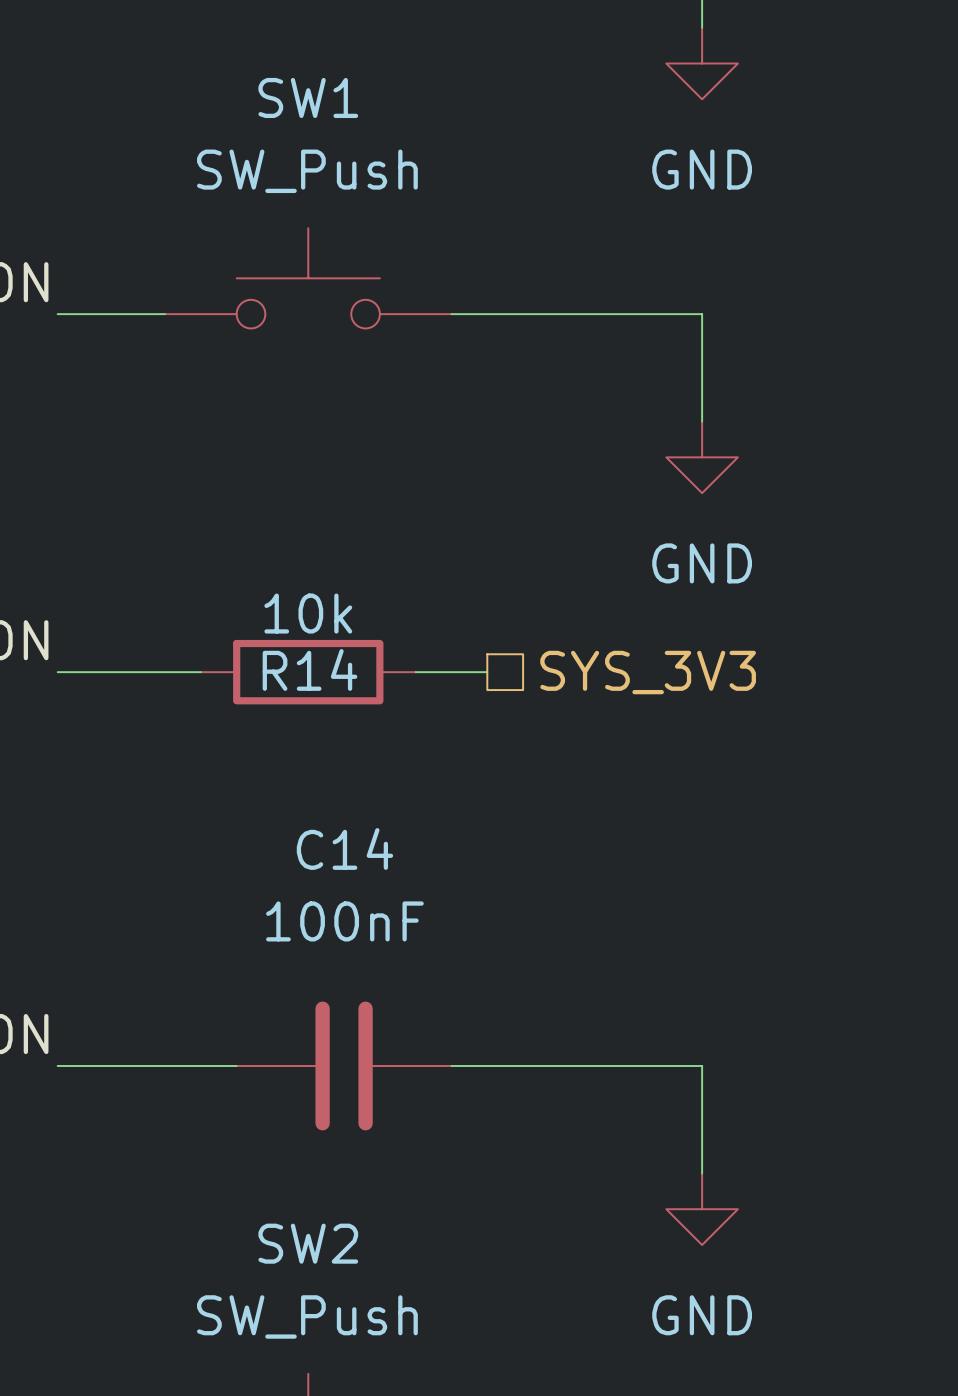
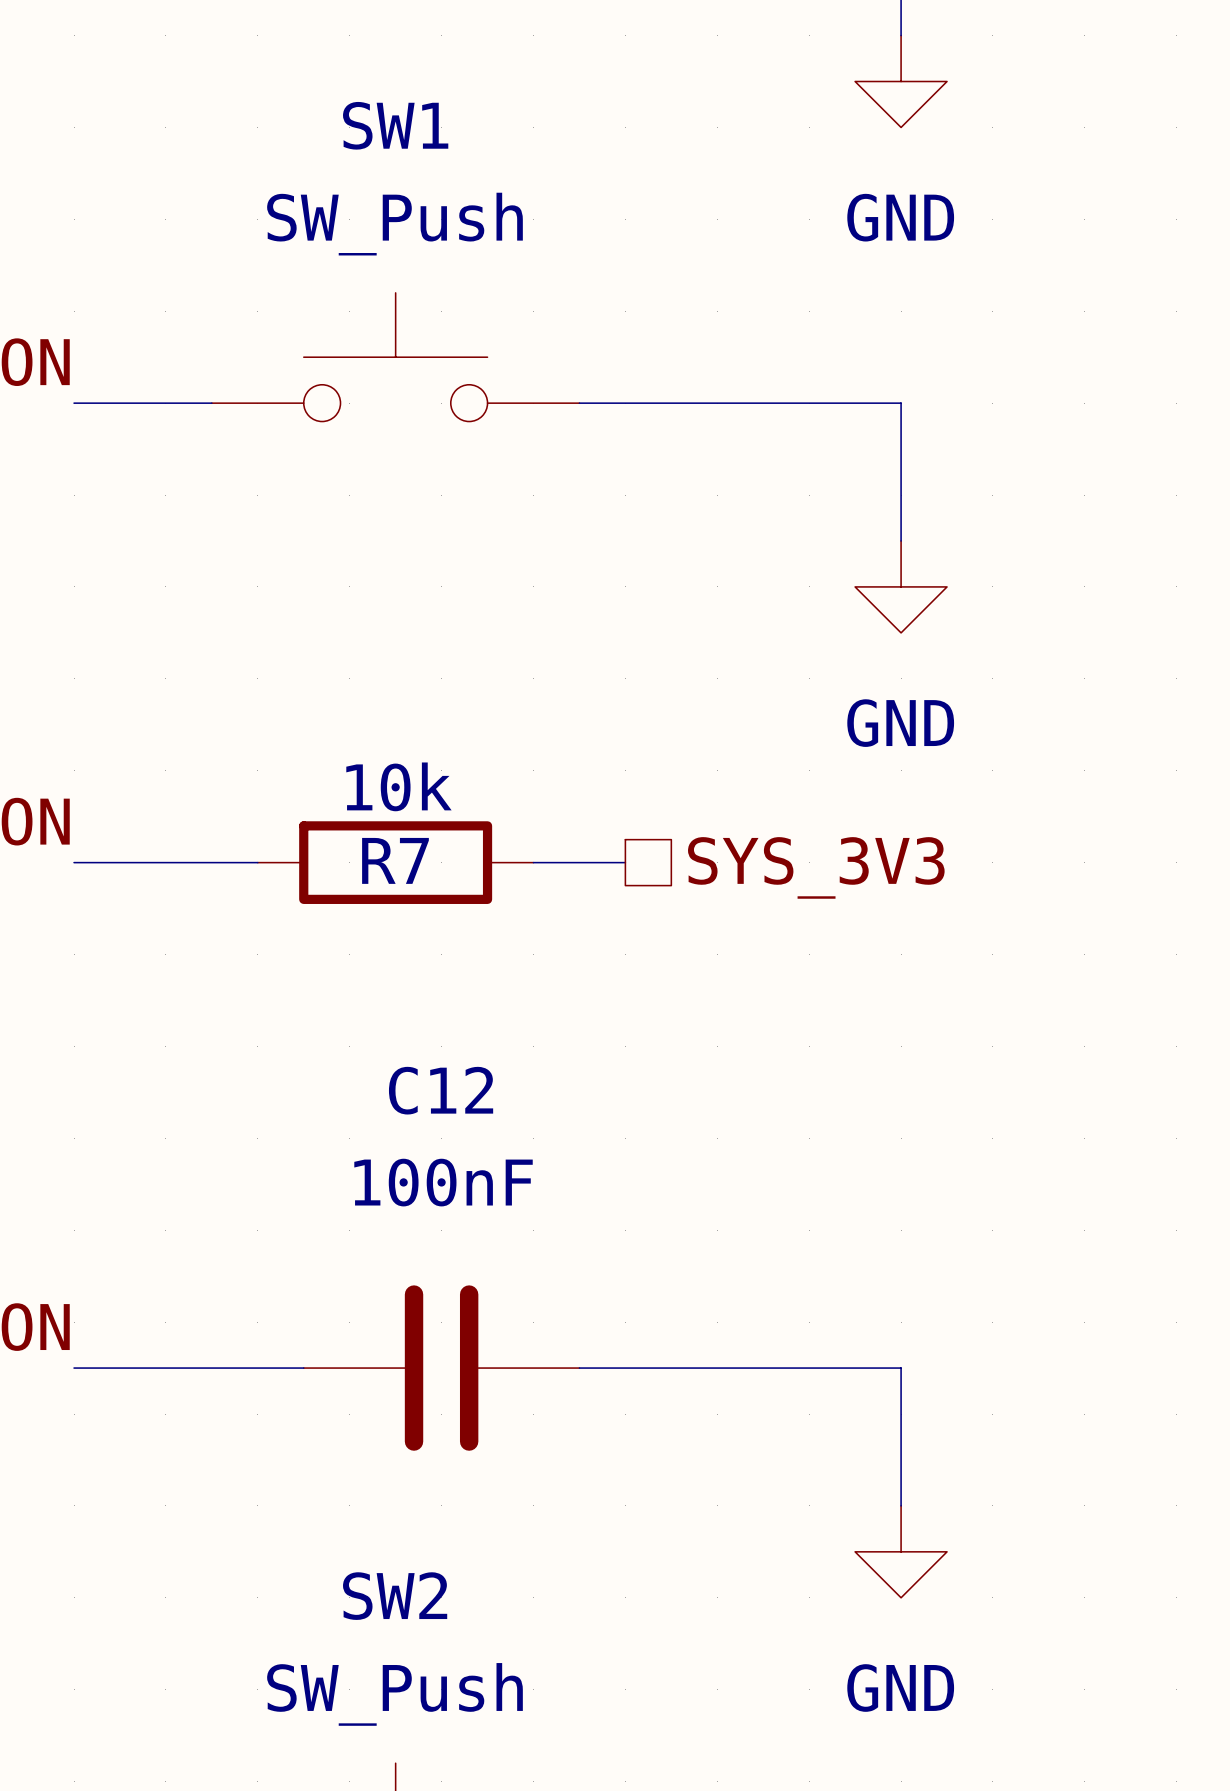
R14 name: R14 (309, 669) -> R7 (395, 860)
C14 name: C14 (344, 848) -> C12 (441, 1090)

